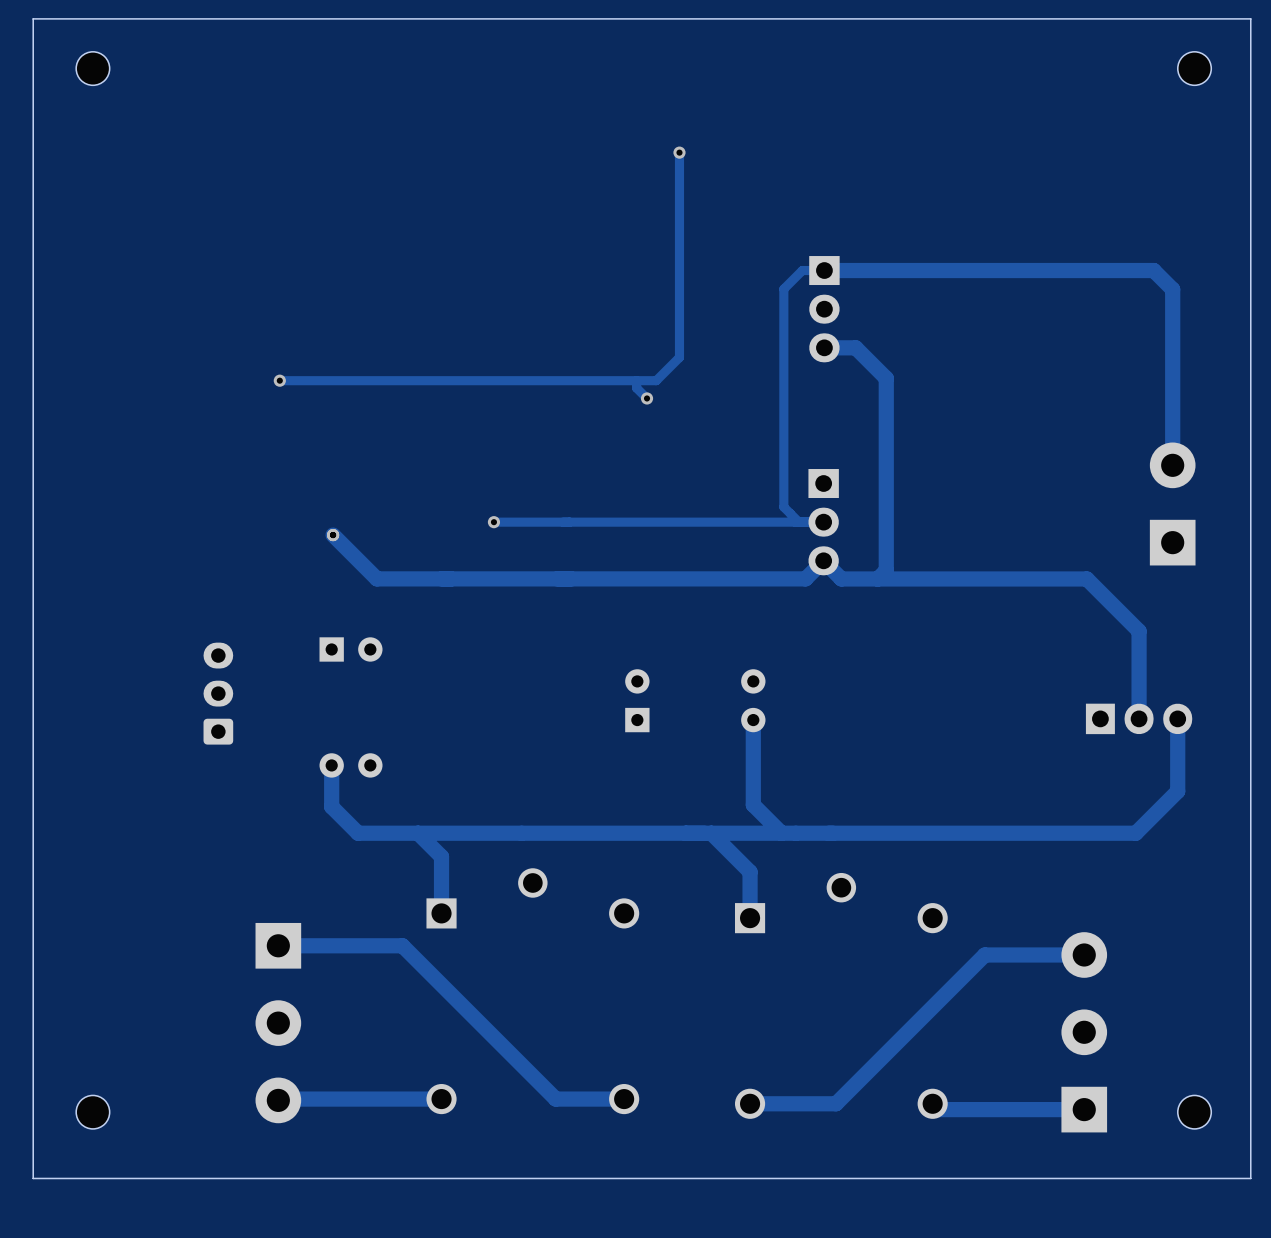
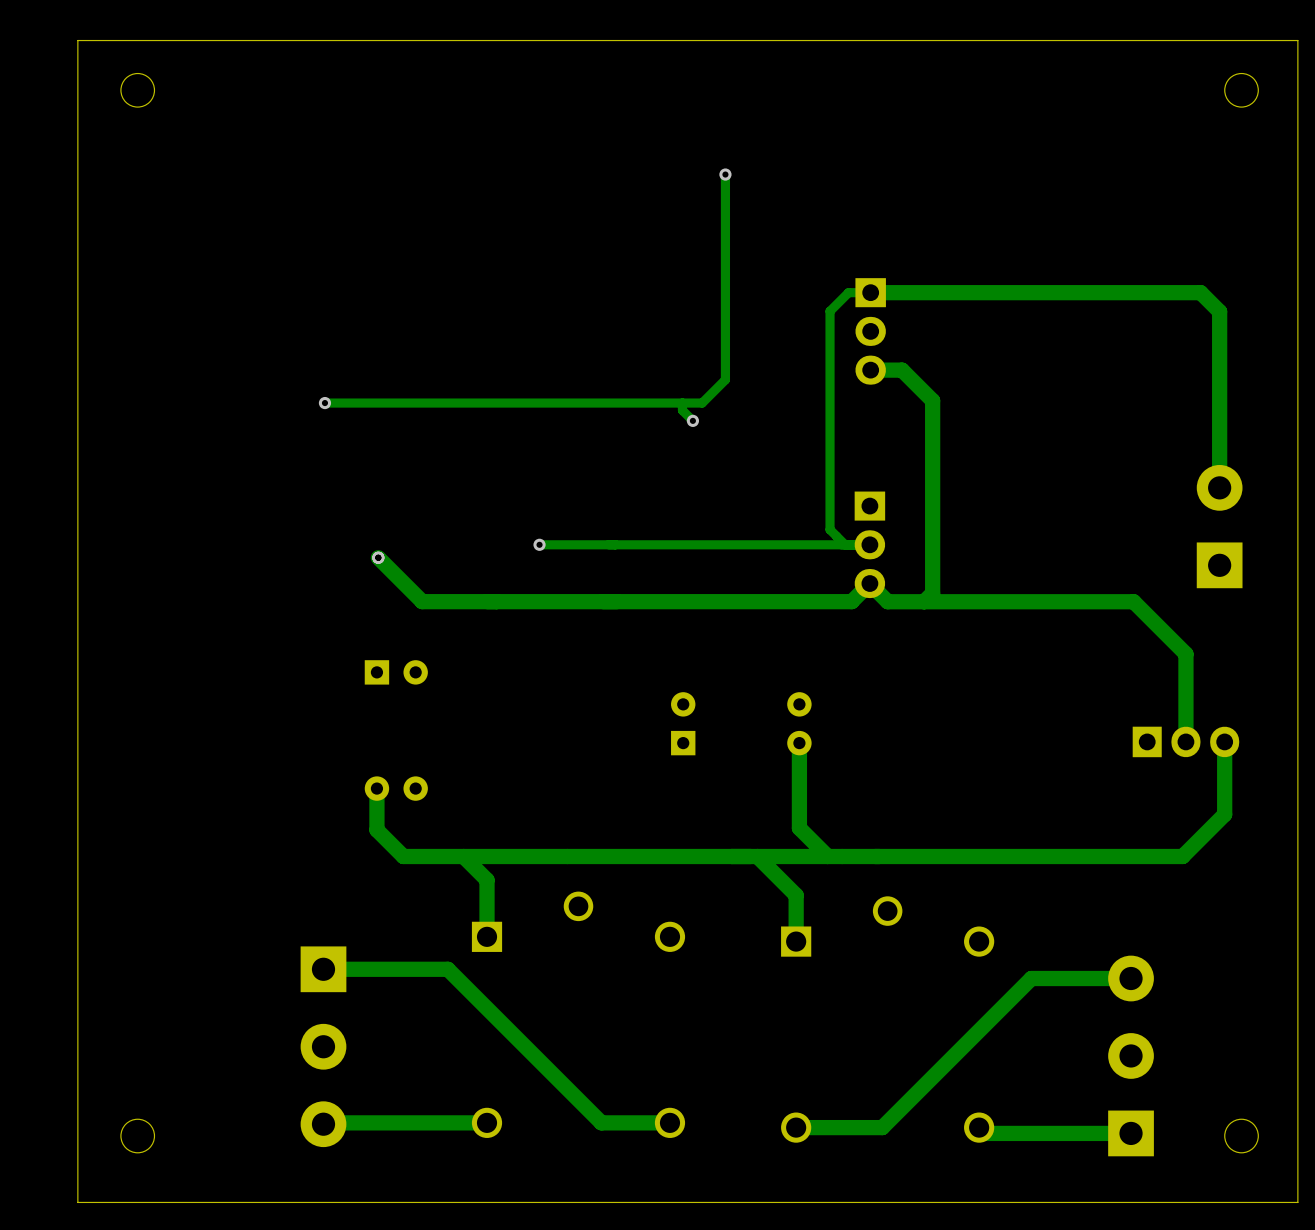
part: (218, 693) -> none

